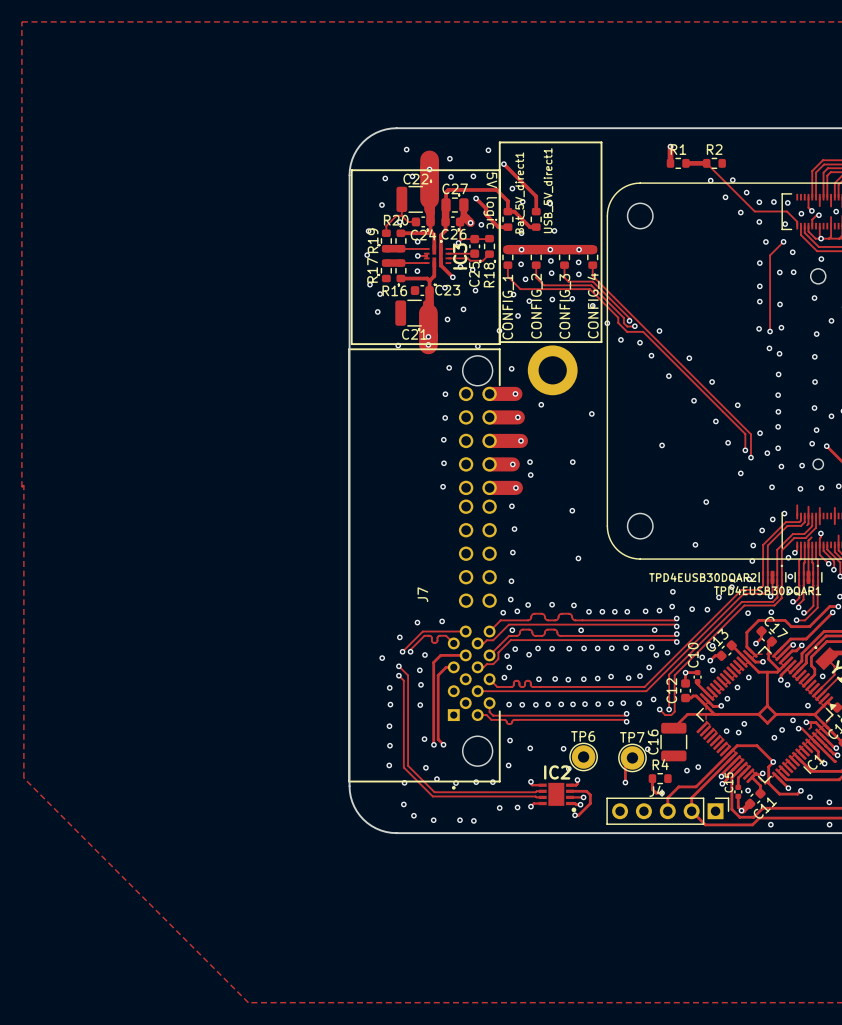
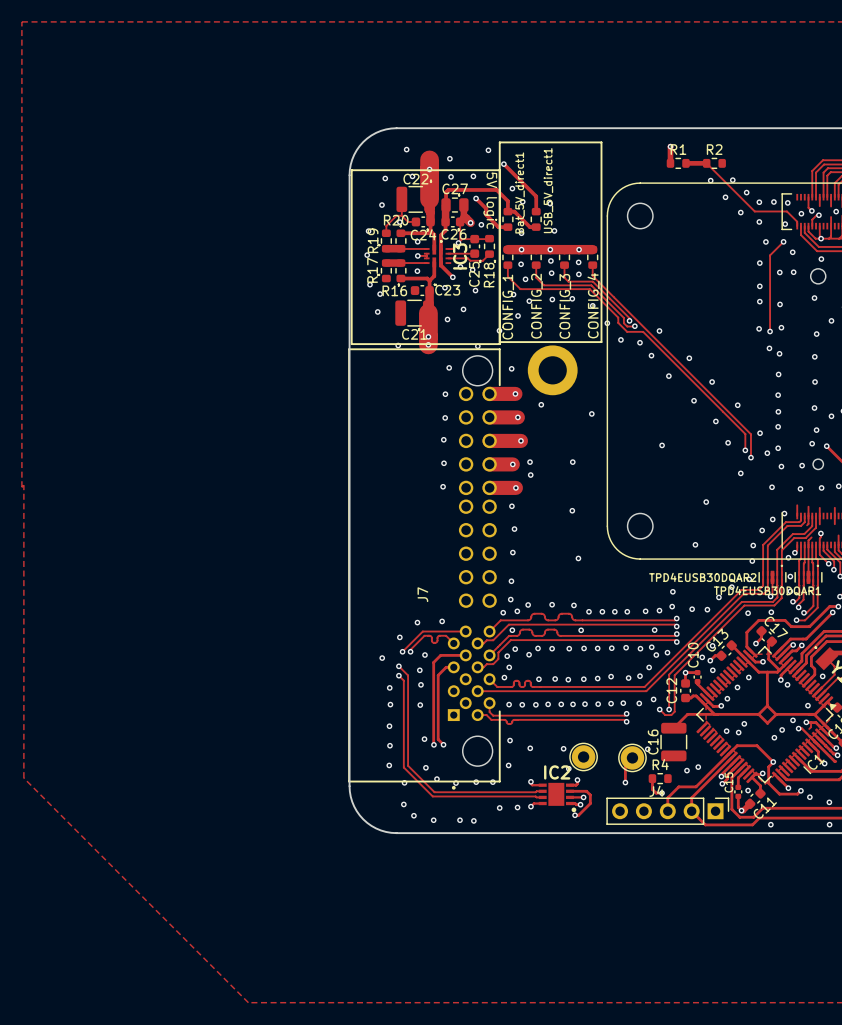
TP6 name: TP6 (583, 736) -> none
TP7 name: TP7 (632, 737) -> none

